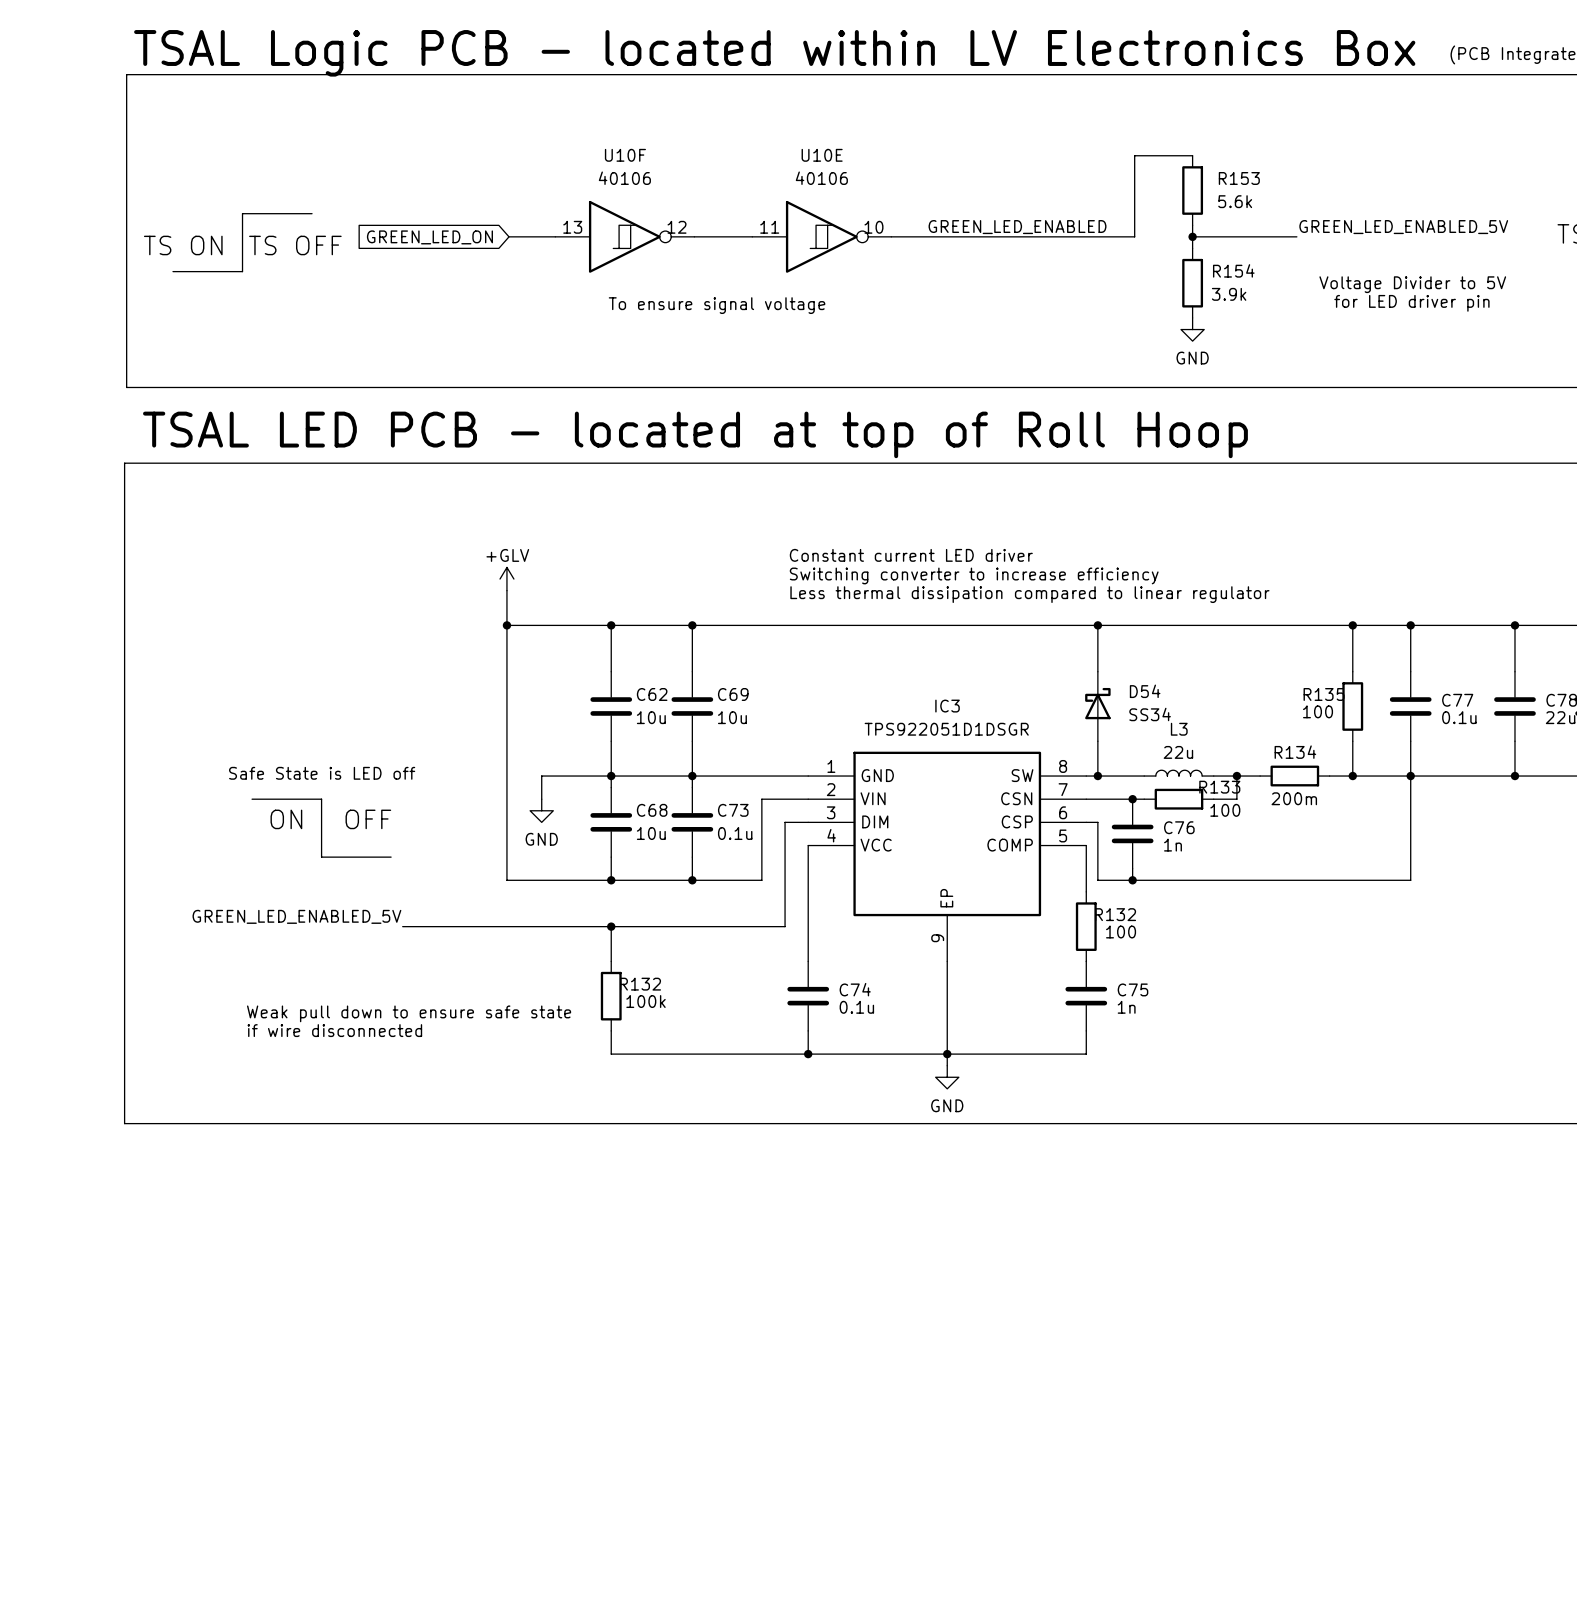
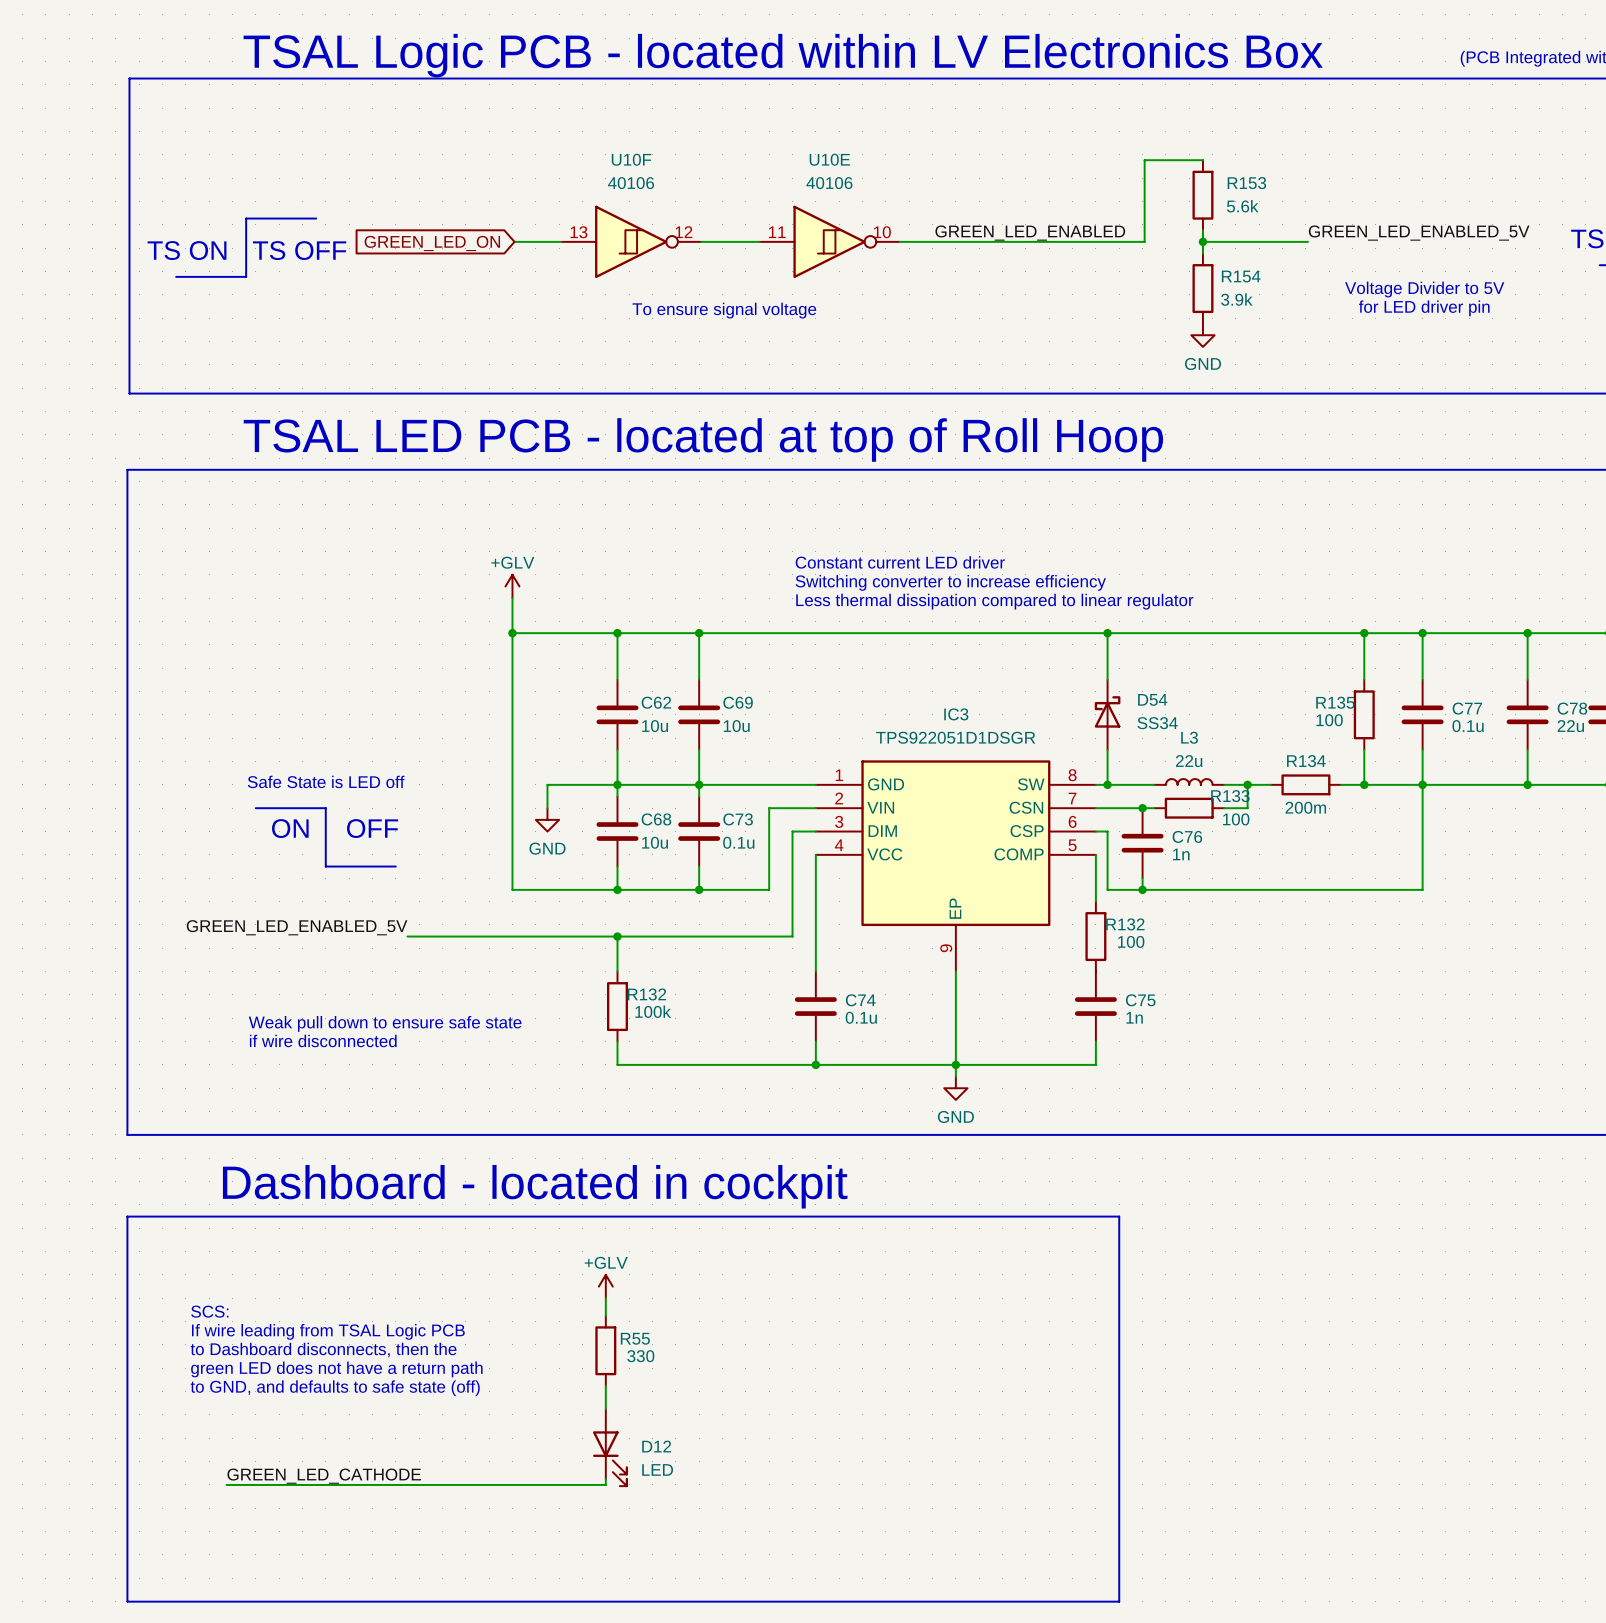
text: none -> Dashboard - located in cockpit (535, 1186)
line: none -> (127, 1216) (1119, 1216) (1119, 1601) (127, 1601) (127, 1216)
power symbol: none -> +GLV (605, 1286)
wire: none -> (605, 1298) (605, 1315)
text: none -> SCS: (209, 1311)
text: none -> If wire leading from TSAL Logic PCB (328, 1331)
text: none -> to Dashboard disconnects, then the (323, 1349)
R55: none -> 330 (605, 1350)
text: none -> green LED does not have a return path (336, 1369)
wire: none -> (605, 1385) (605, 1409)
text: none -> to GND, and defaults to safe state (off) (335, 1388)
D12: none -> LED (609, 1447)
label: none -> GREEN_LED_CATHODE (324, 1476)
wire: none -> (605, 1479) (605, 1484) (226, 1484)

